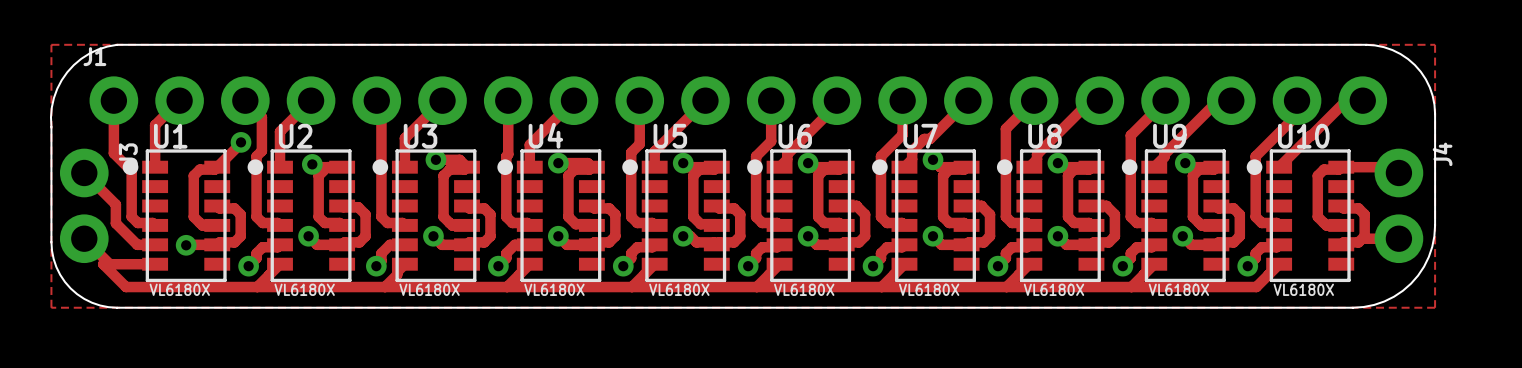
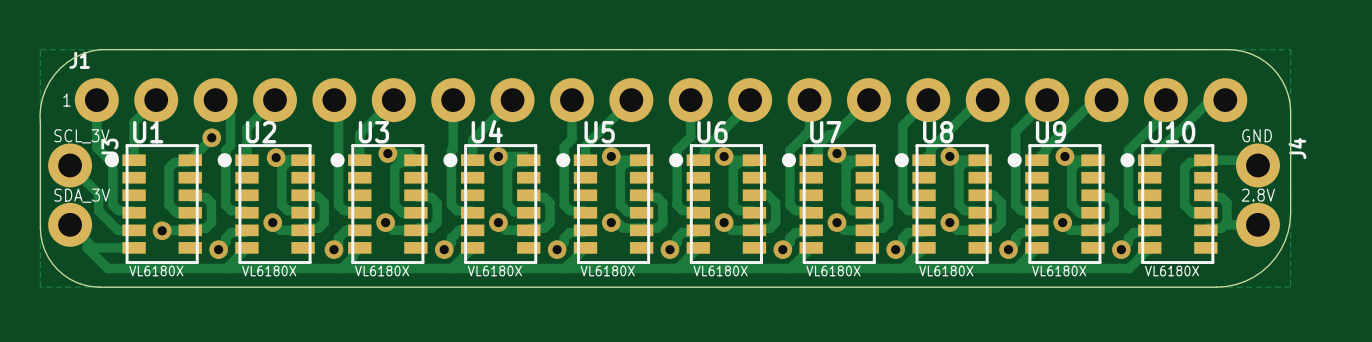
text: none -> 1 (66, 100)
text: none -> SCL_3V (81, 136)
text: none -> GND (1257, 135)
text: none -> 2.8V (1258, 195)
text: none -> SDA_3V (82, 195)

